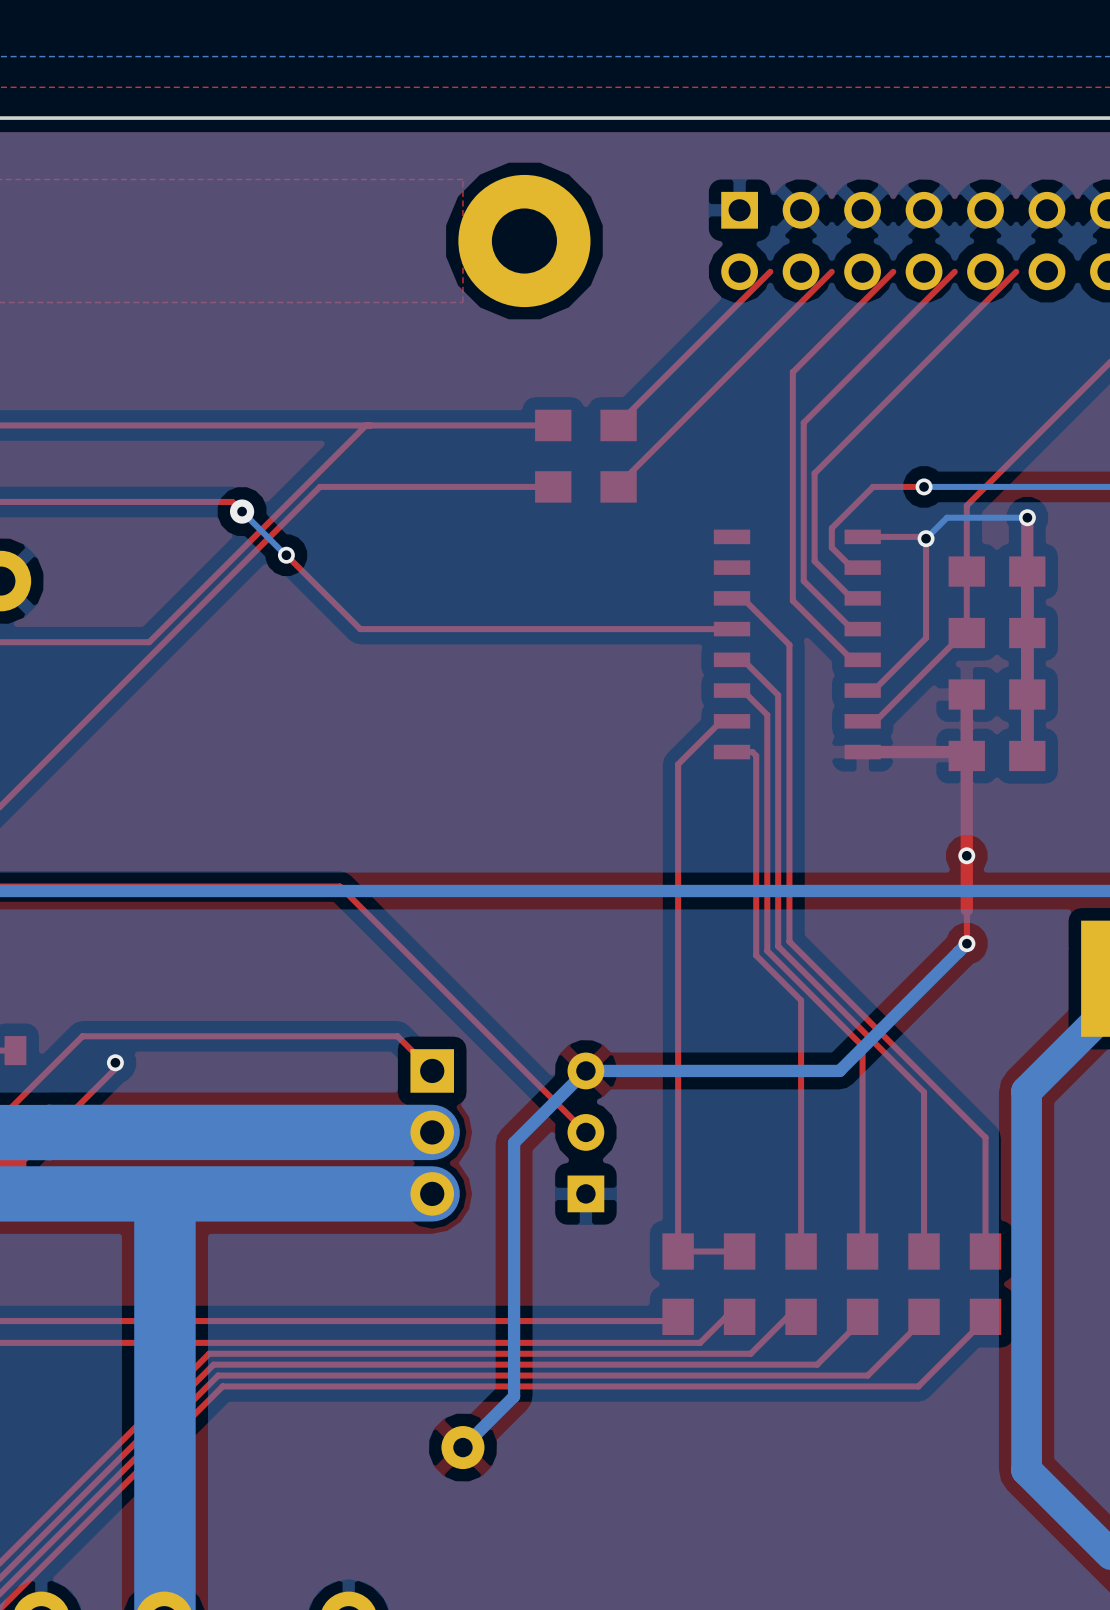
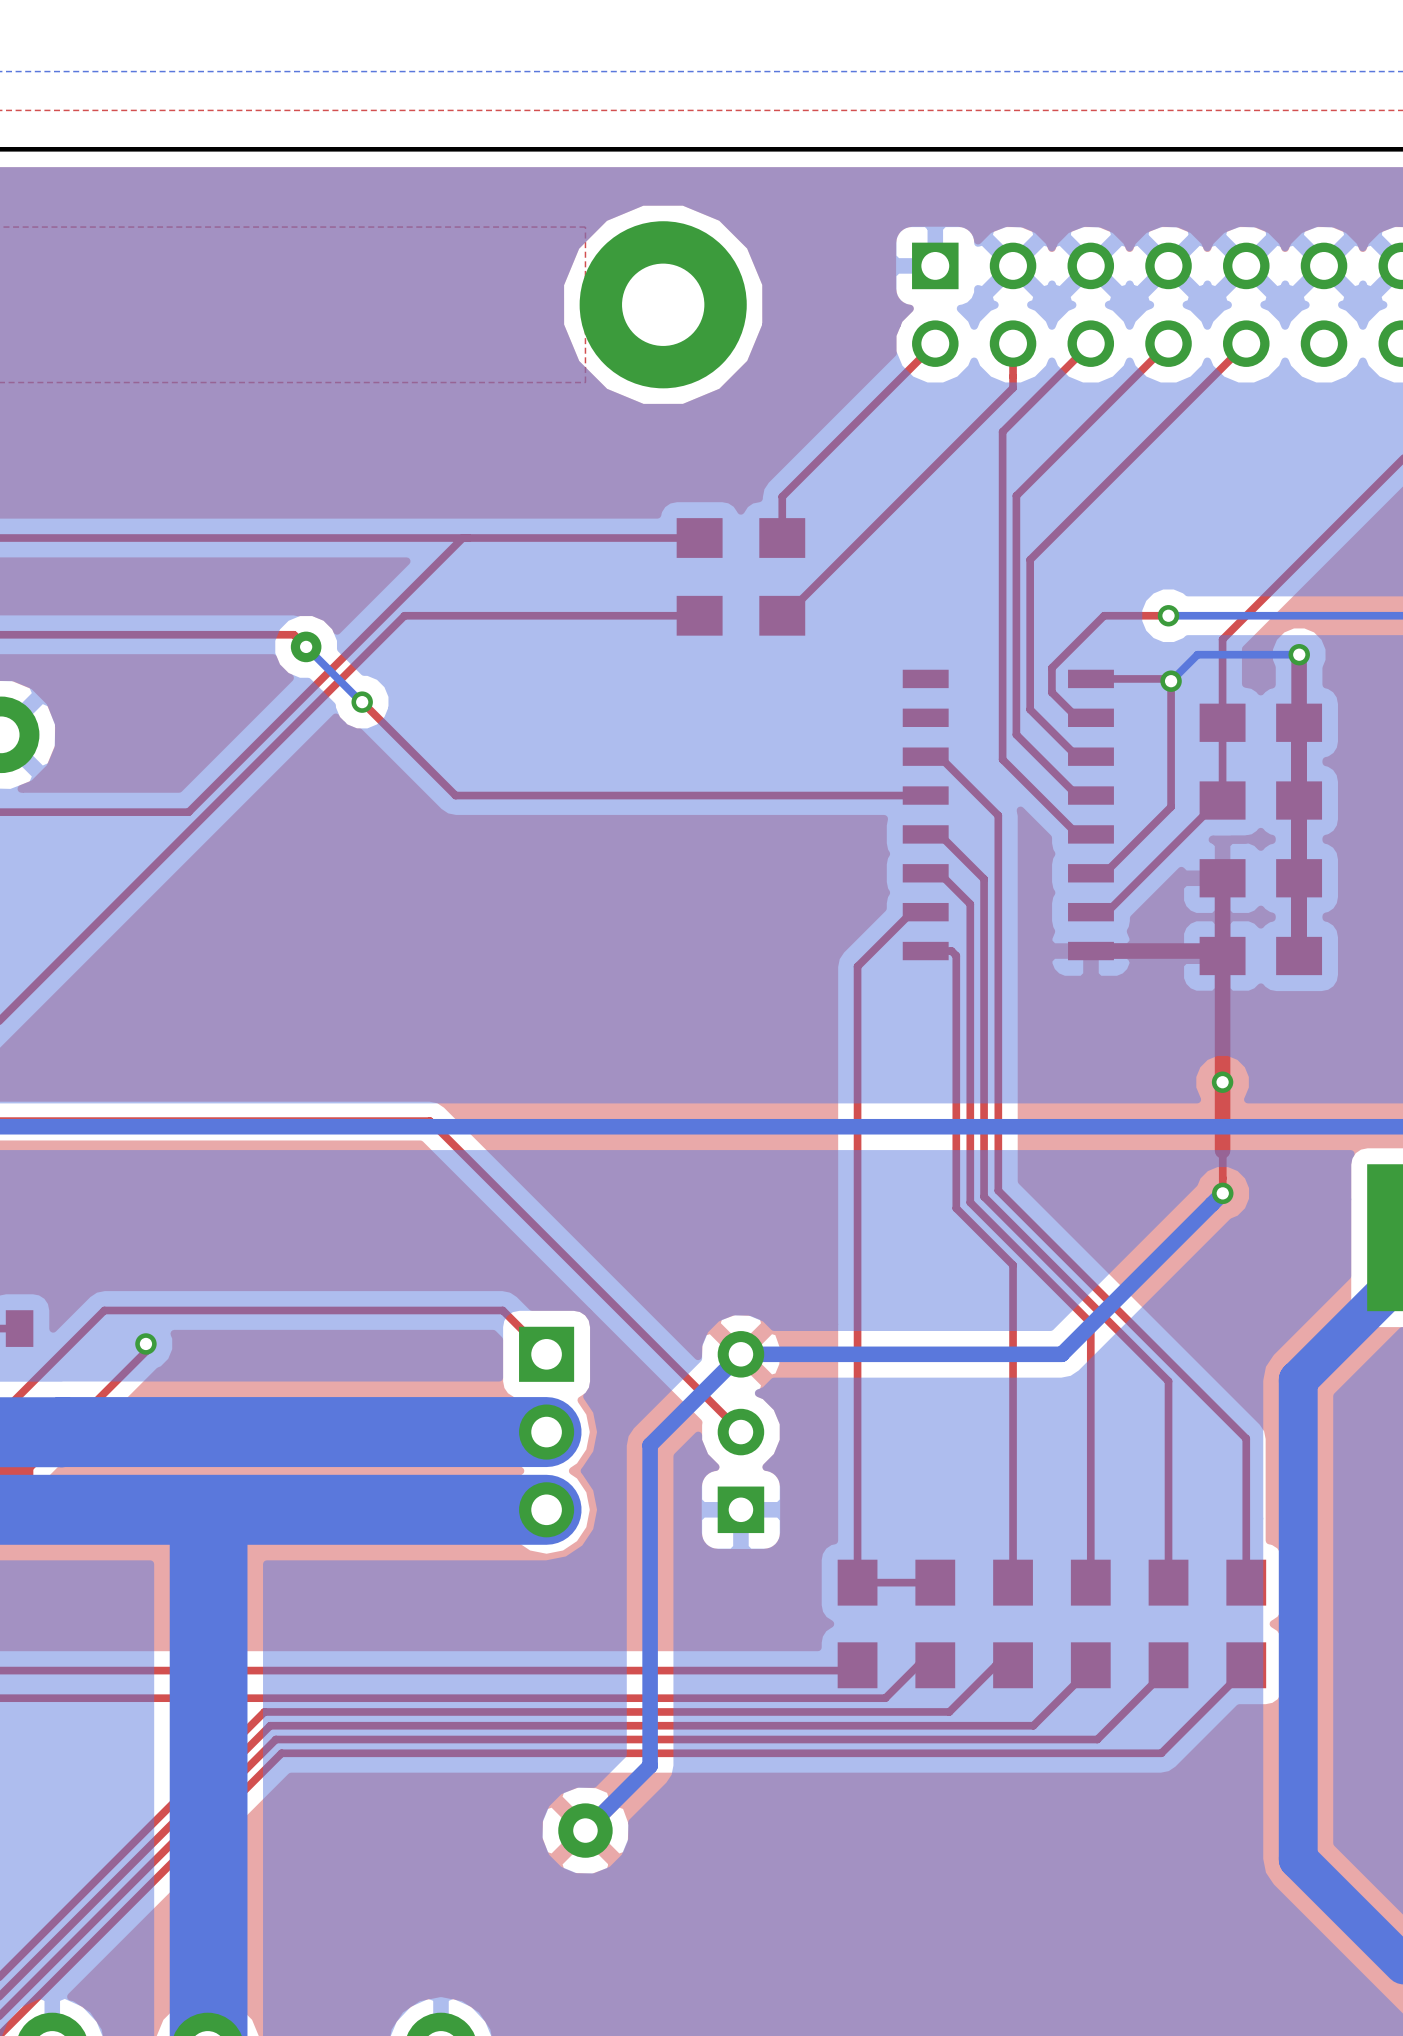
top track: (770, 271) (618, 423) -> (935, 343) (782, 496) (782, 535)
top track: none -> (1013, 343) (1013, 388) (785, 615) (782, 615)
top track: (831, 271) (618, 484) -> none
top track: (893, 271) (792, 372) -> (1090, 343) (1002, 431) (1002, 470)
top track: (954, 271) (803, 422) -> (1168, 343) (1016, 495) (1016, 534)
top track: (1016, 271) (814, 473) -> (1246, 343) (1030, 559) (1030, 598)

